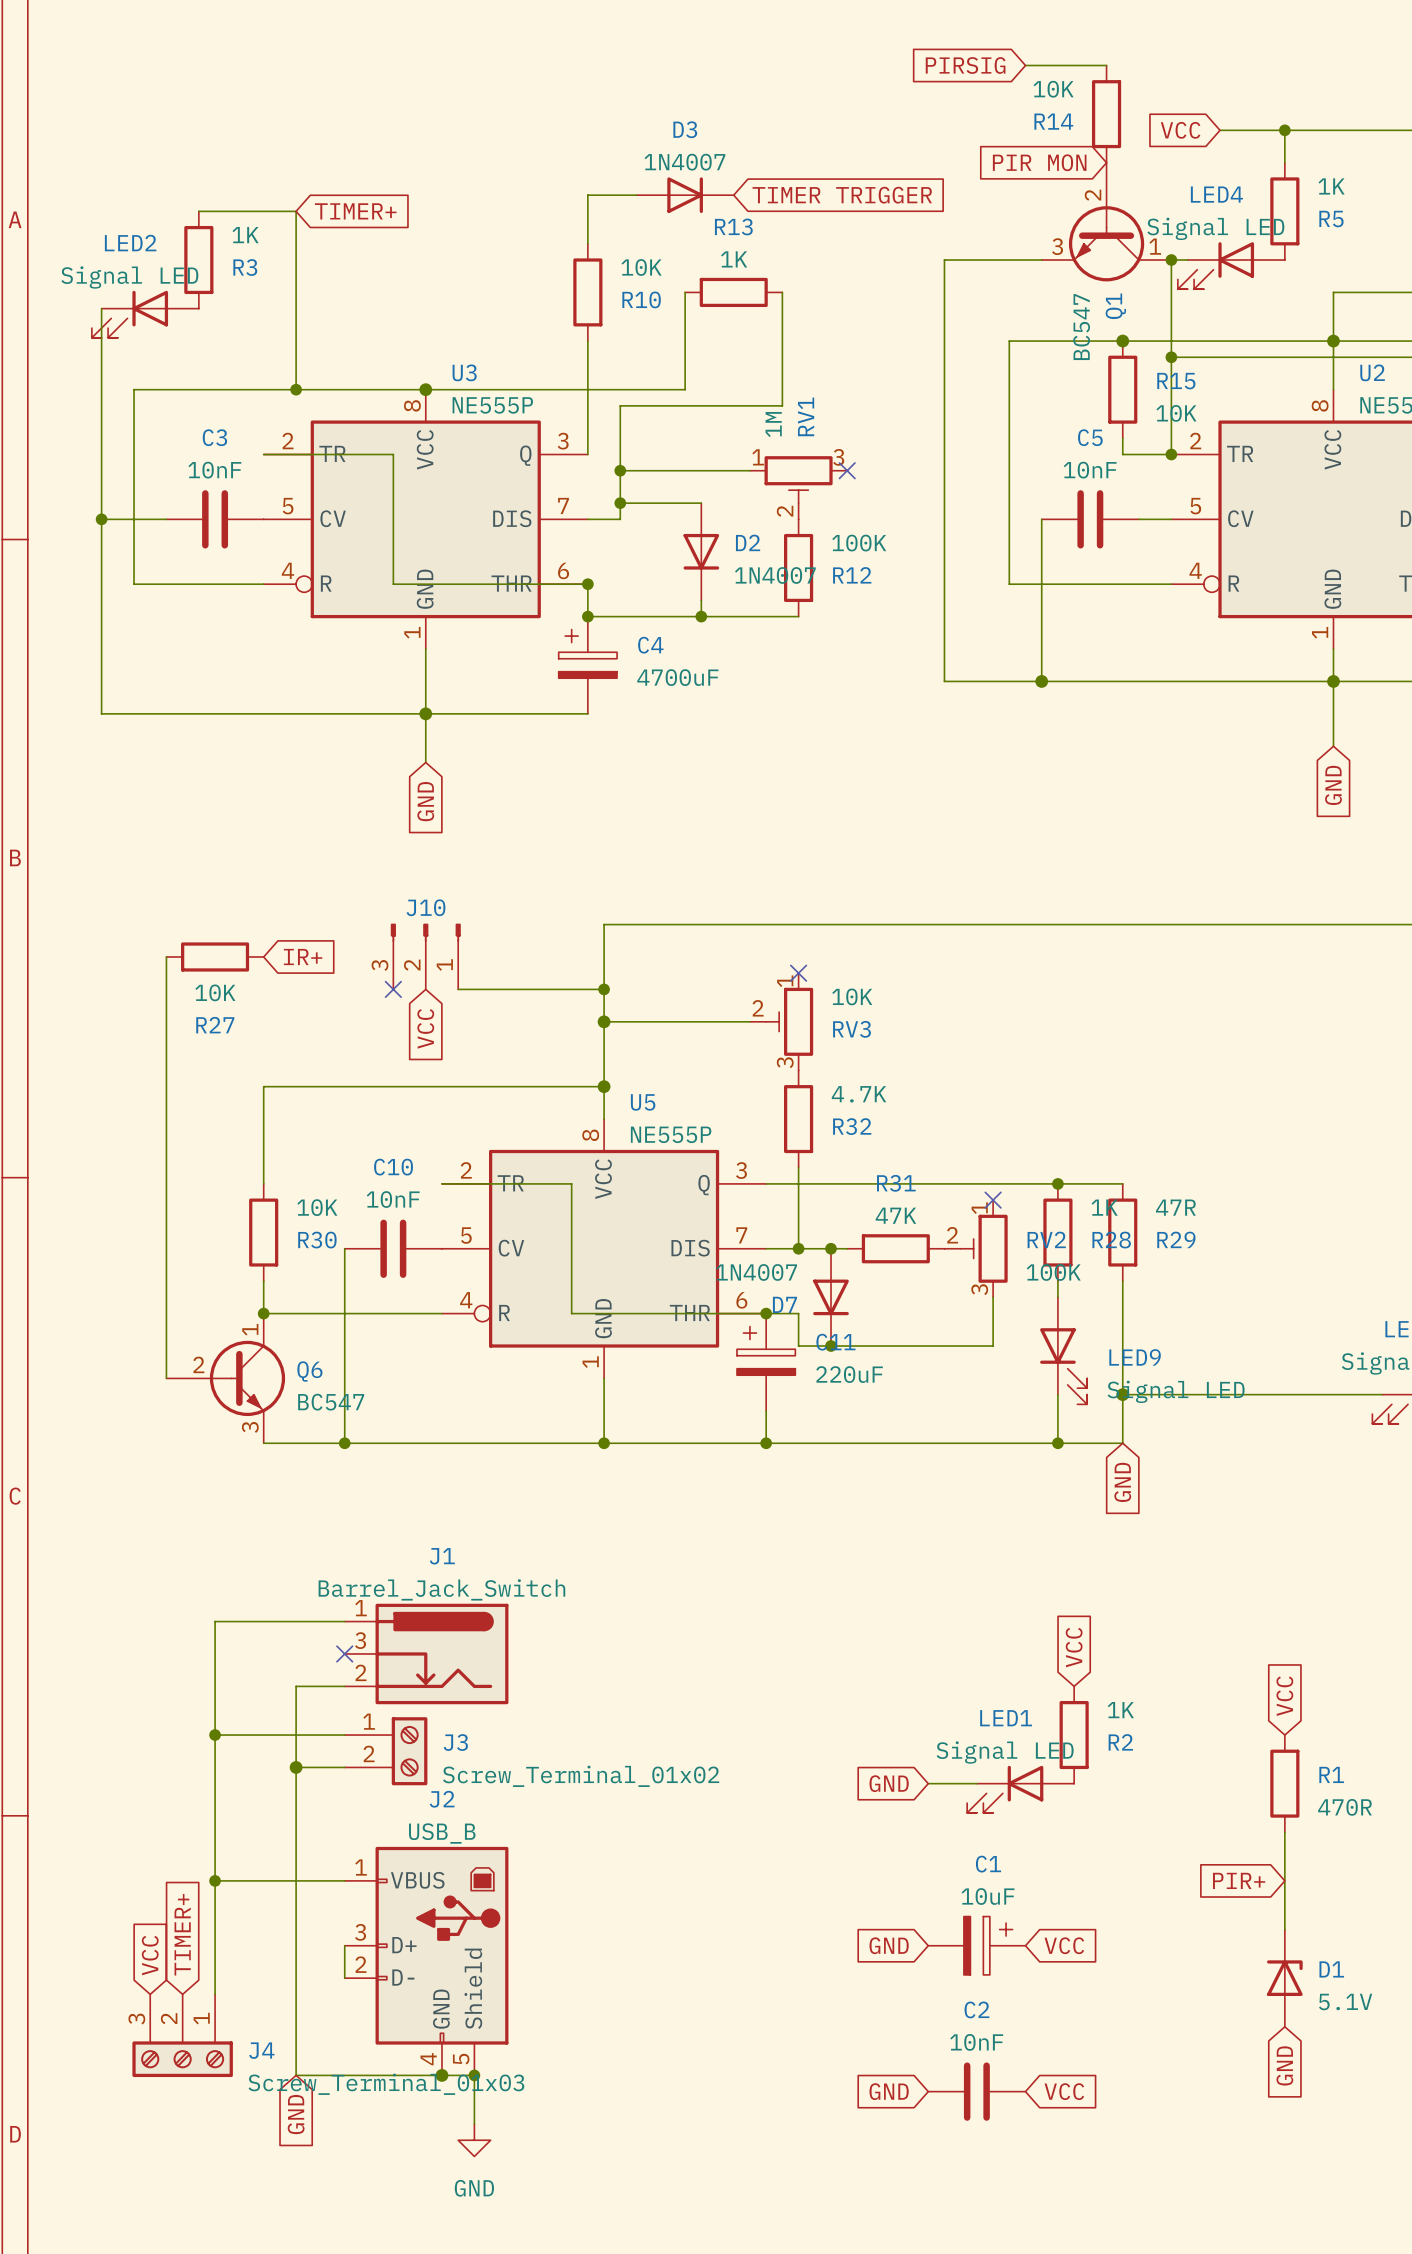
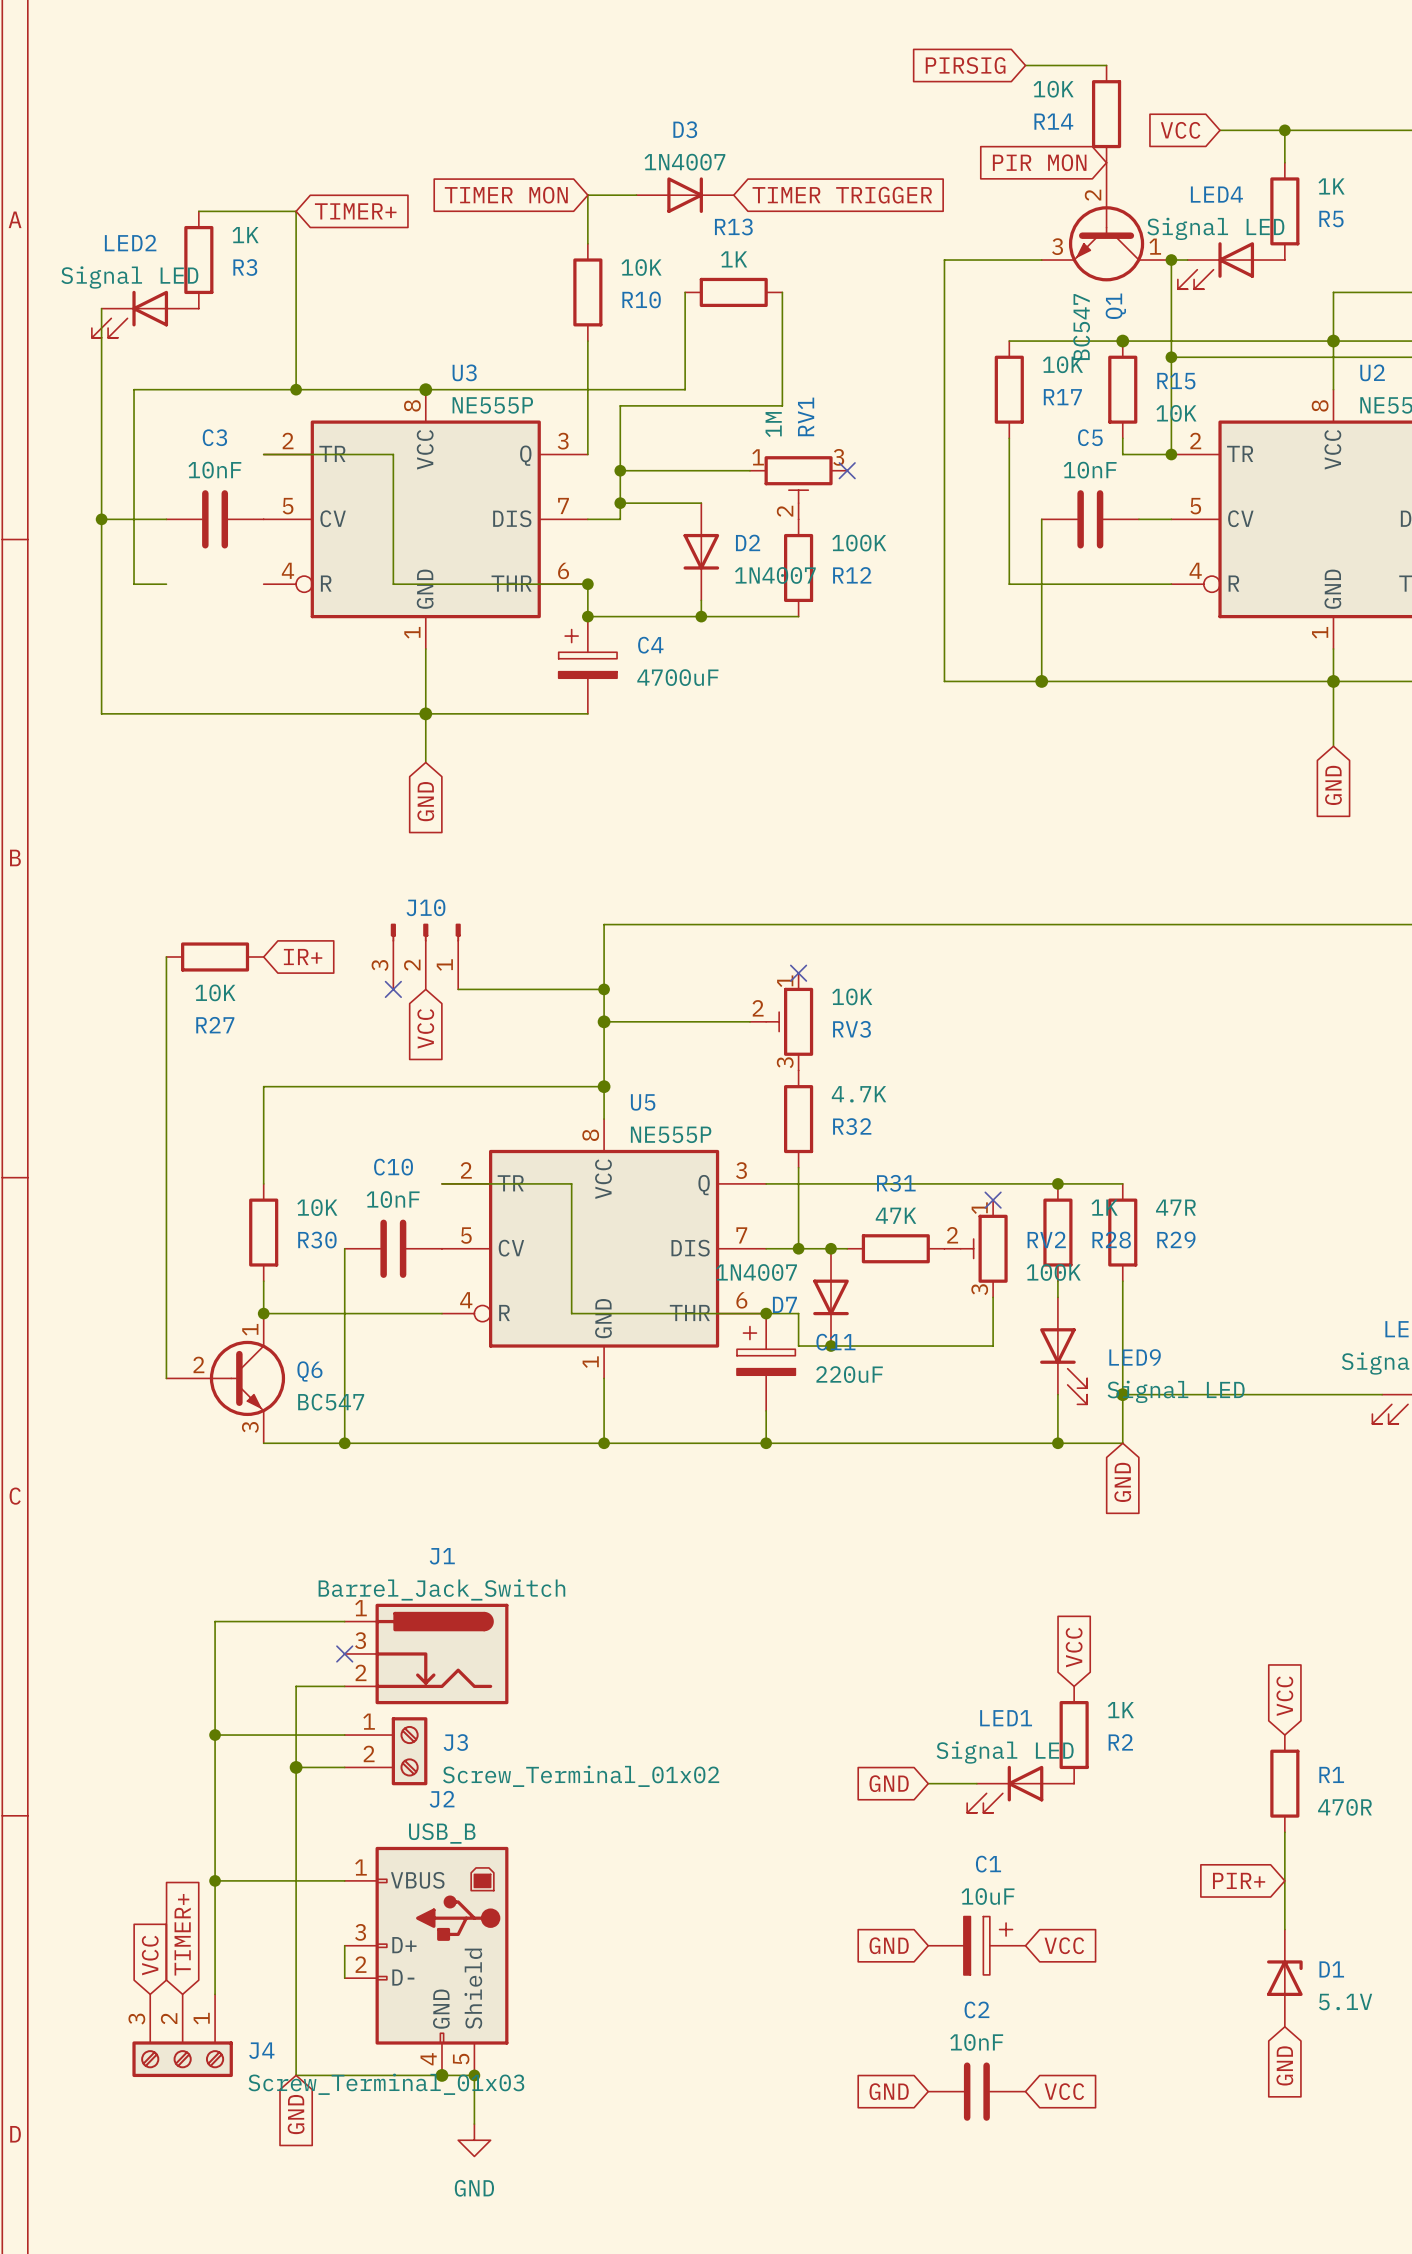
global label: none -> TIMER MON (506, 195)
wire: (1009, 341) (1009, 438) -> none
R17: none -> 10K (1009, 389)
wire: (166, 584) (263, 584) -> none

